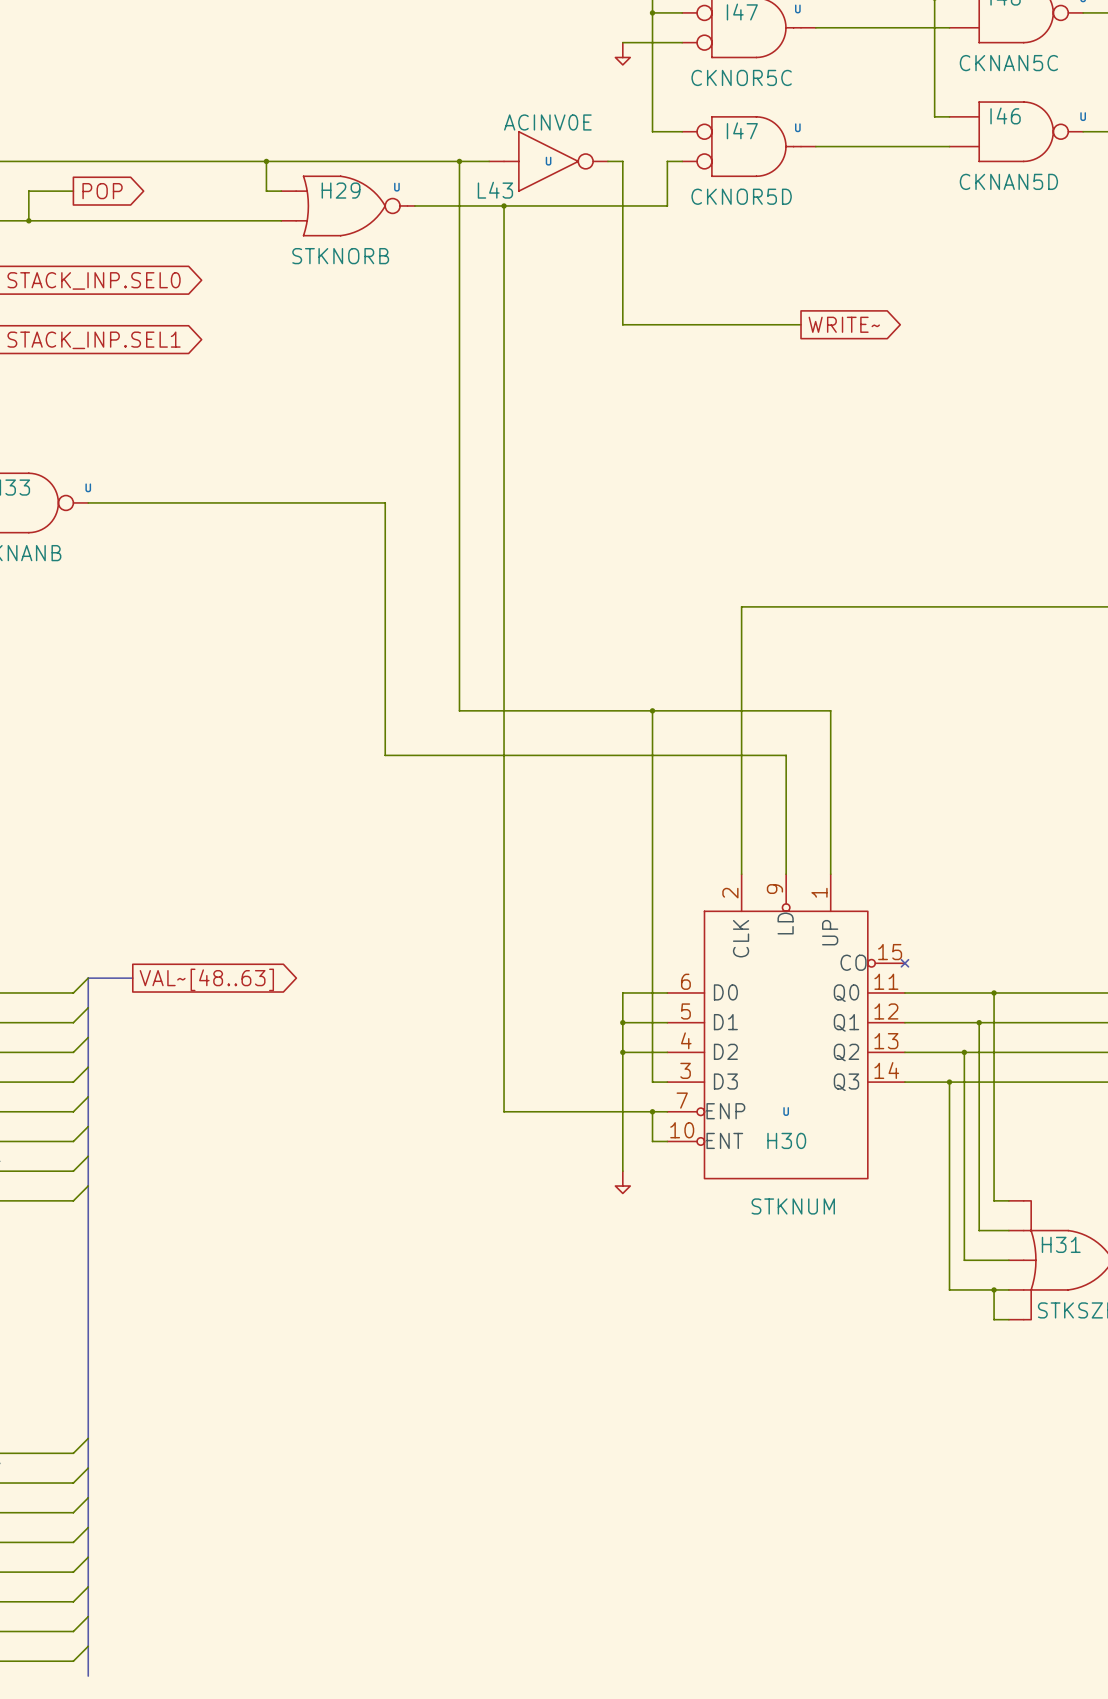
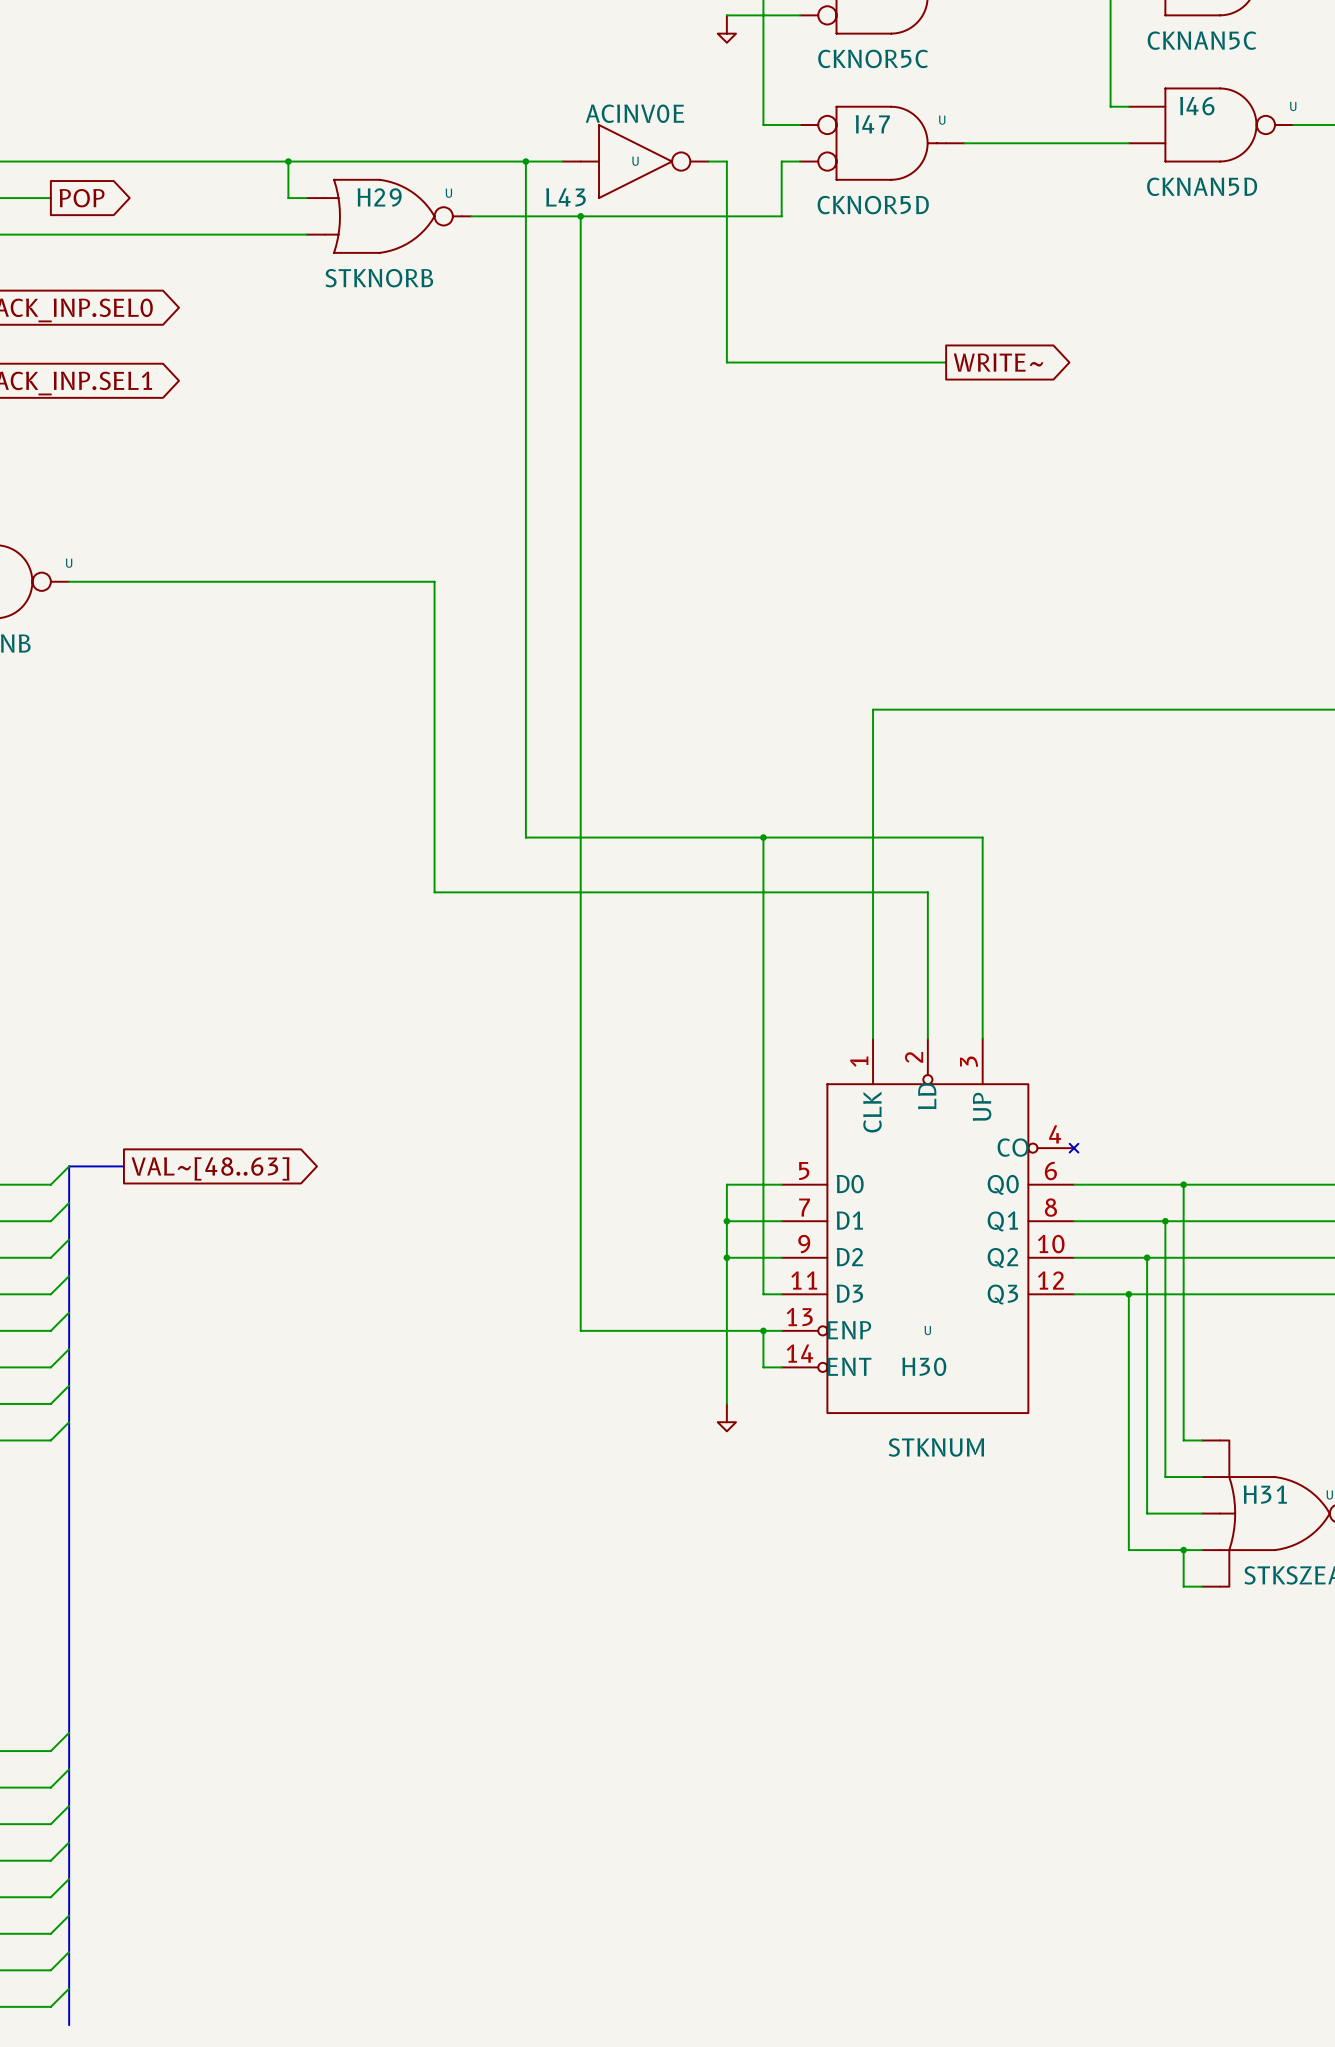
U symbol: [667, 874, 905, 1179] -> [781, 1038, 1075, 1414]

